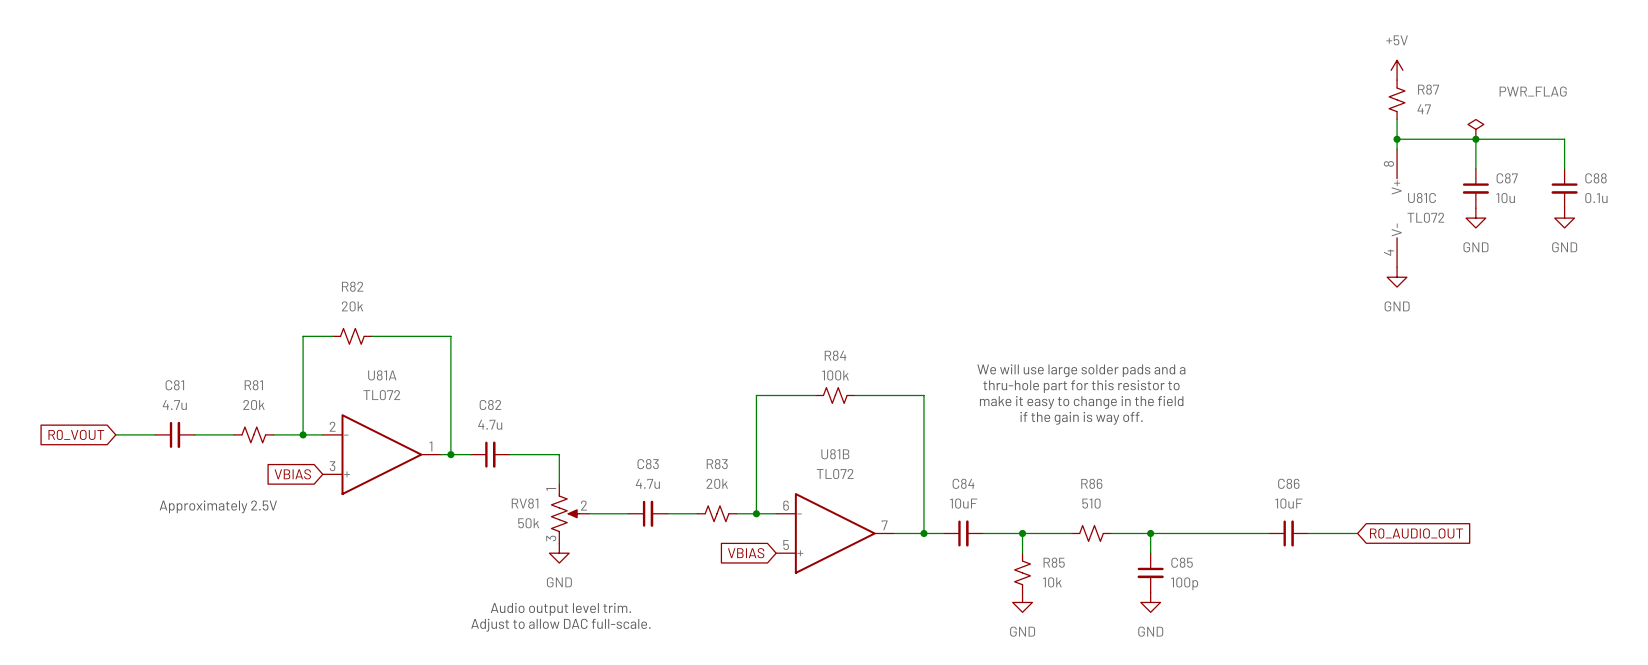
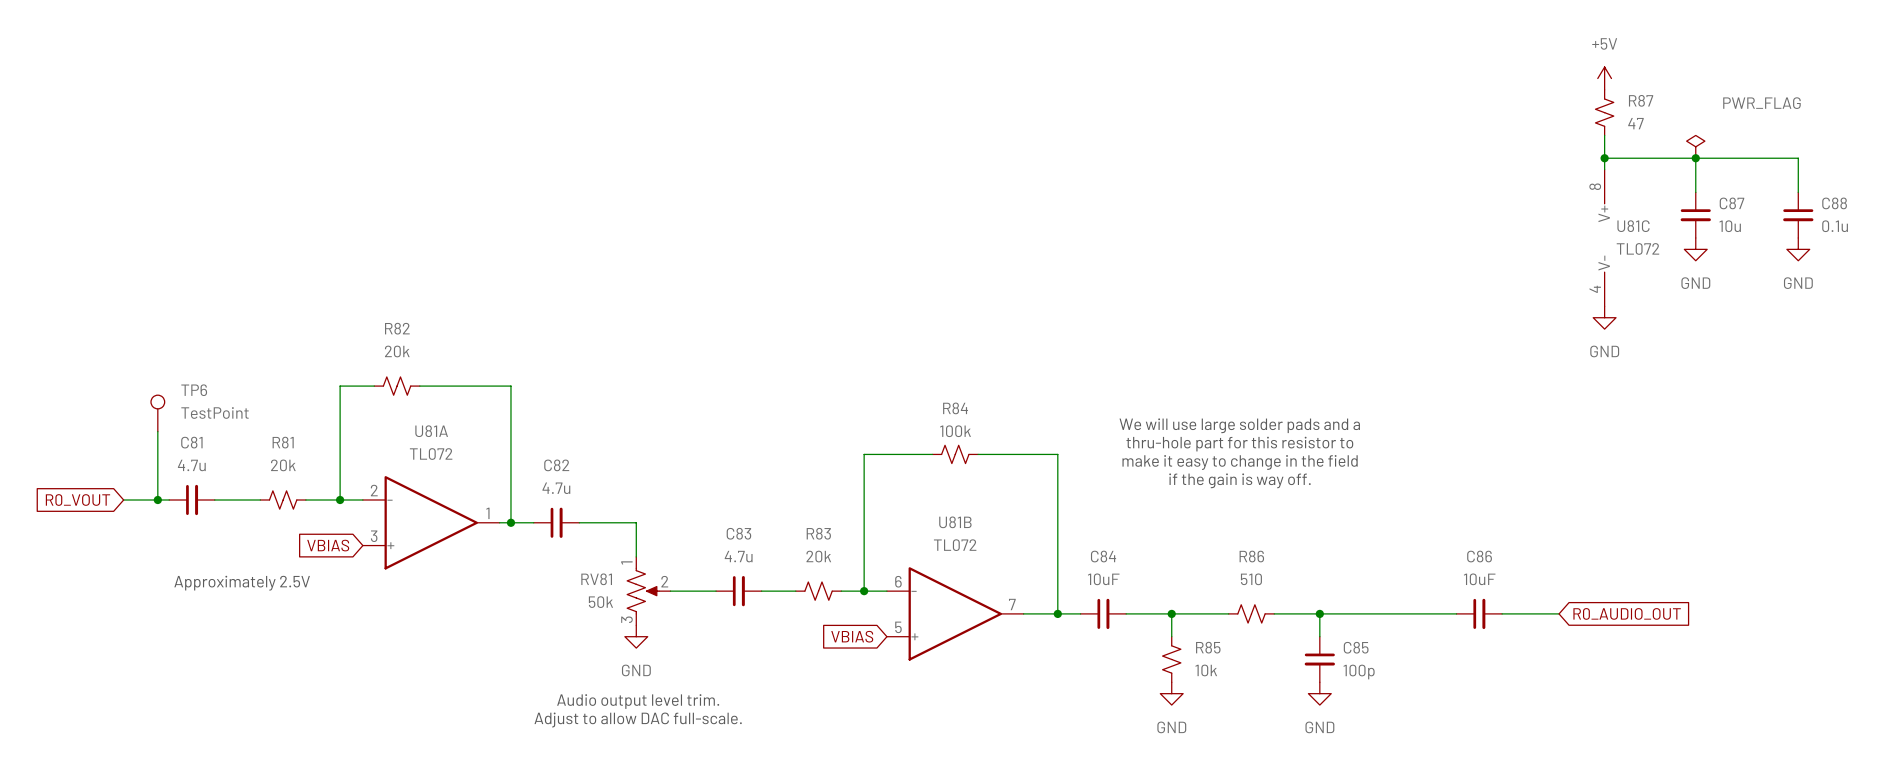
TP6: none -> TestPoint (157, 413)
wire: none -> (157, 431) (157, 500)
junction: none -> (157, 500)

